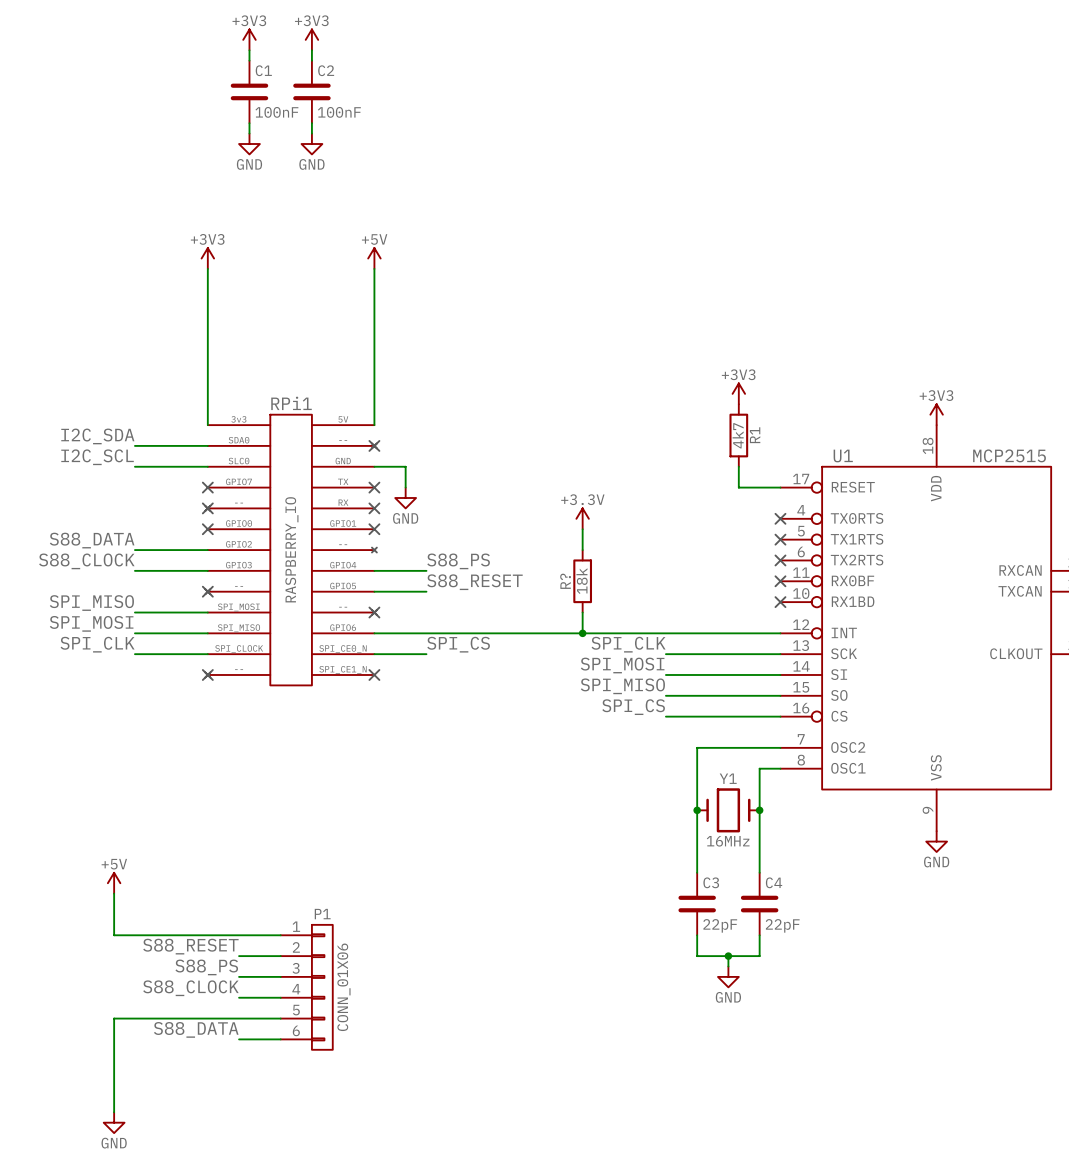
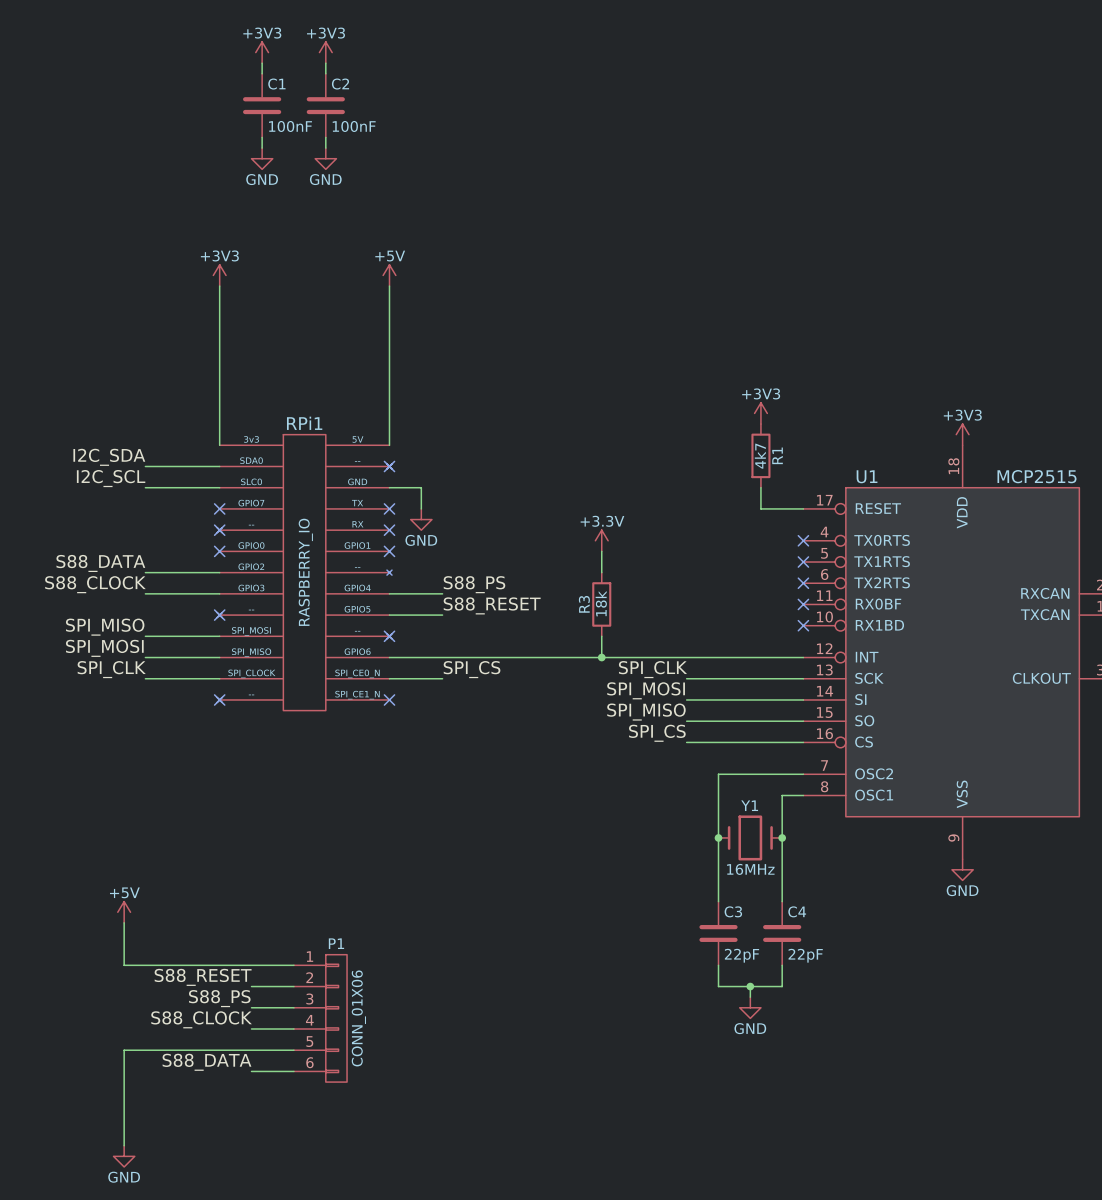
R? name: R? (565, 581) -> R3 (584, 604)

